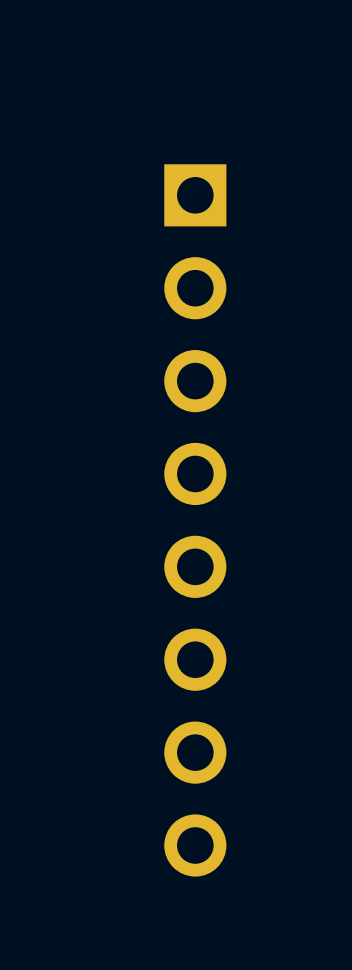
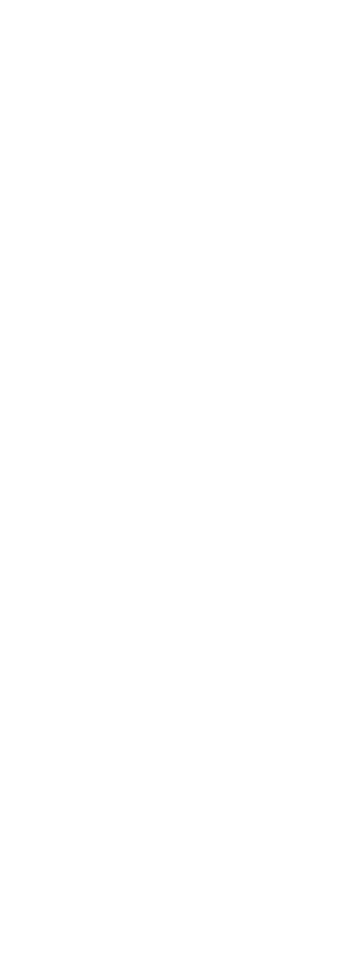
part: (195, 520) -> none

